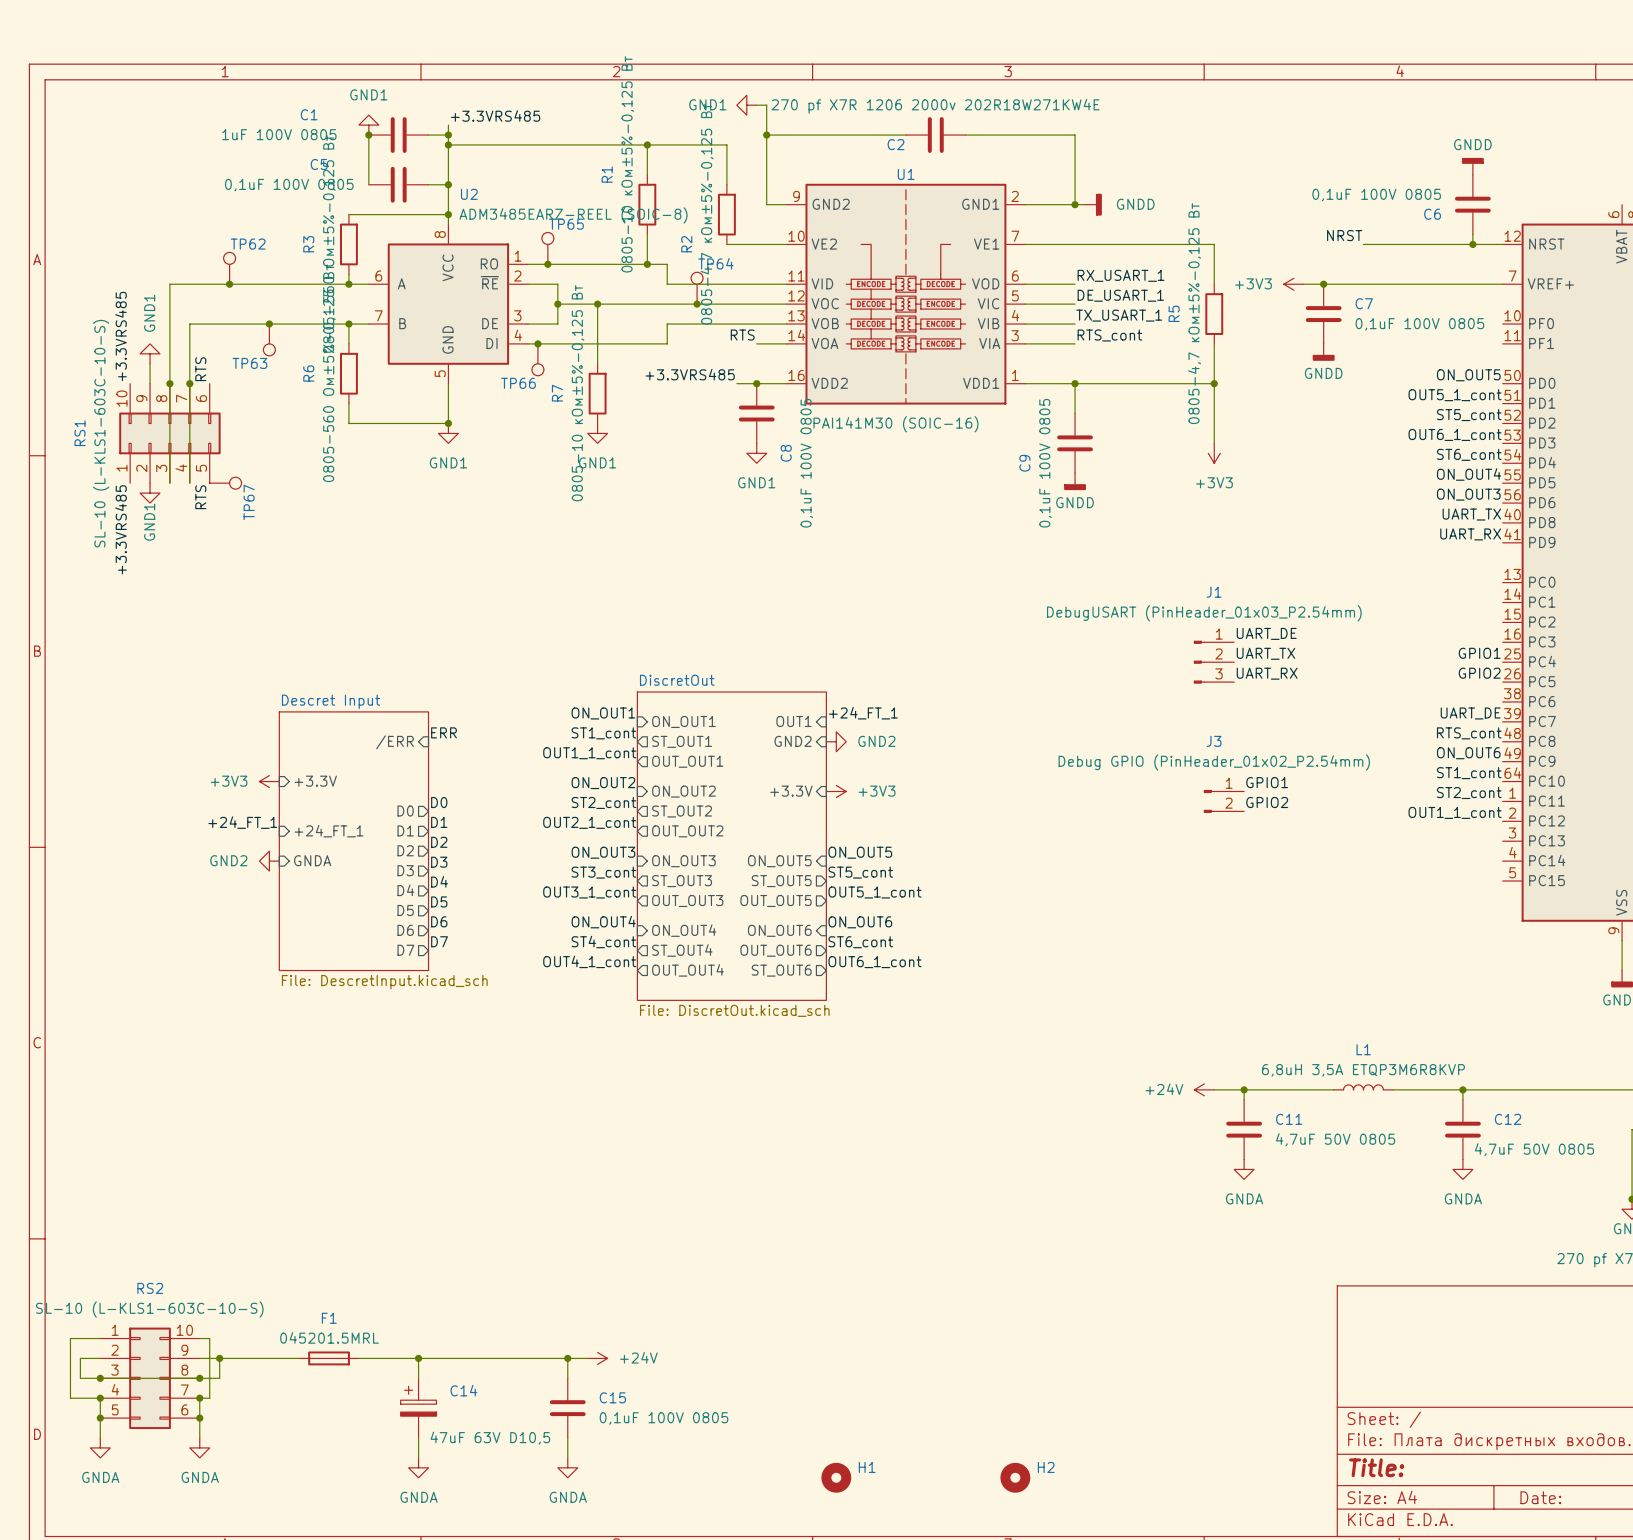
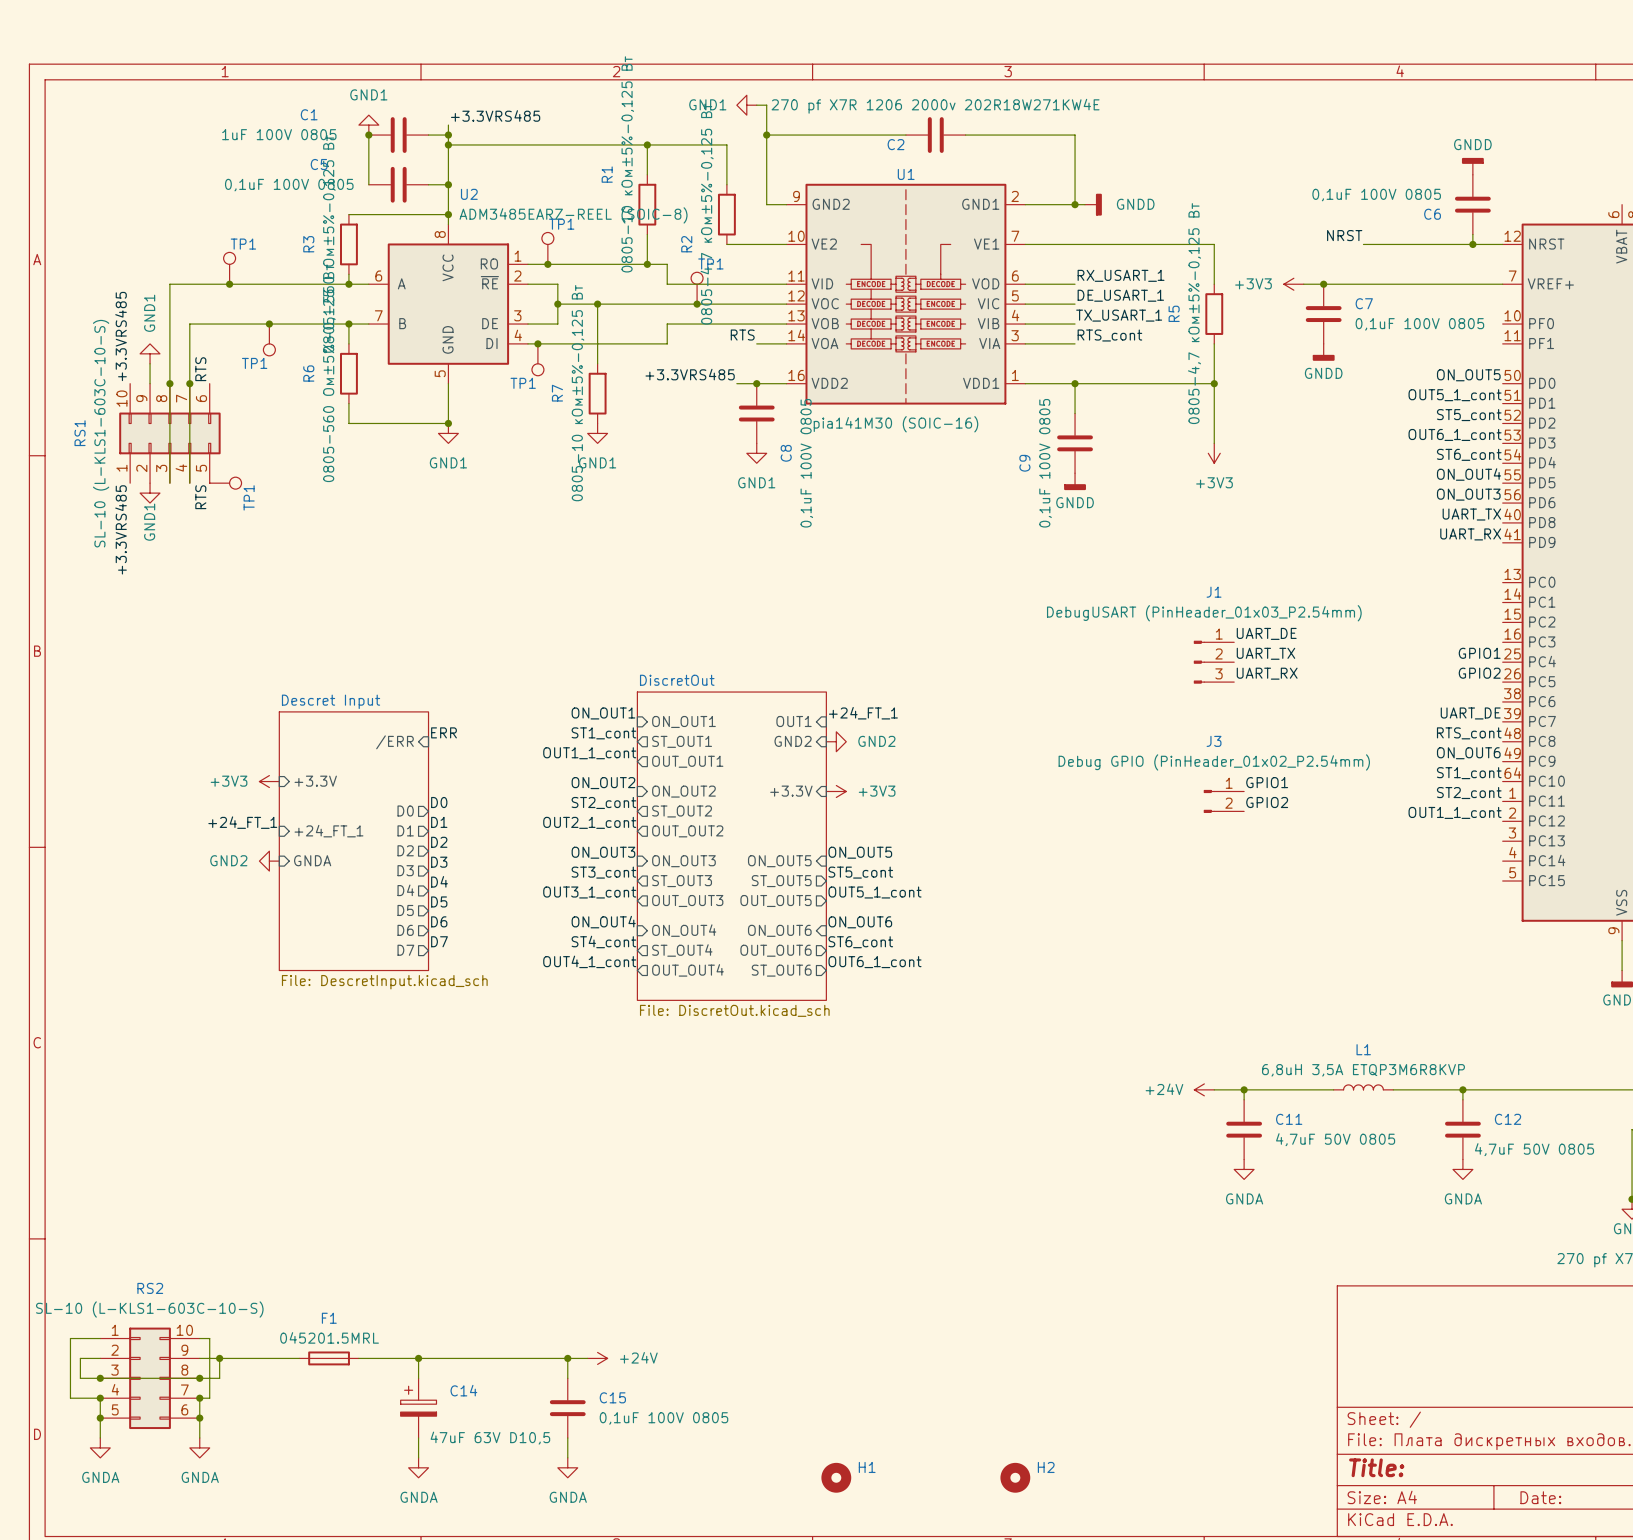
TP65 name: TP65 (566, 224) -> TP1 (561, 224)
TP62 name: TP62 (248, 244) -> TP1 (243, 244)
TP64 name: TP64 (715, 263) -> TP1 (710, 263)
TP63 name: TP63 (249, 363) -> TP1 (254, 363)
TP66 name: TP66 (518, 383) -> TP1 (523, 383)
U1 value: PAI141M30 (SOIC-16) (895, 424) -> pia141M30 (SOIC-16) (895, 424)
TP67 name: TP67 (249, 502) -> TP1 (249, 497)

